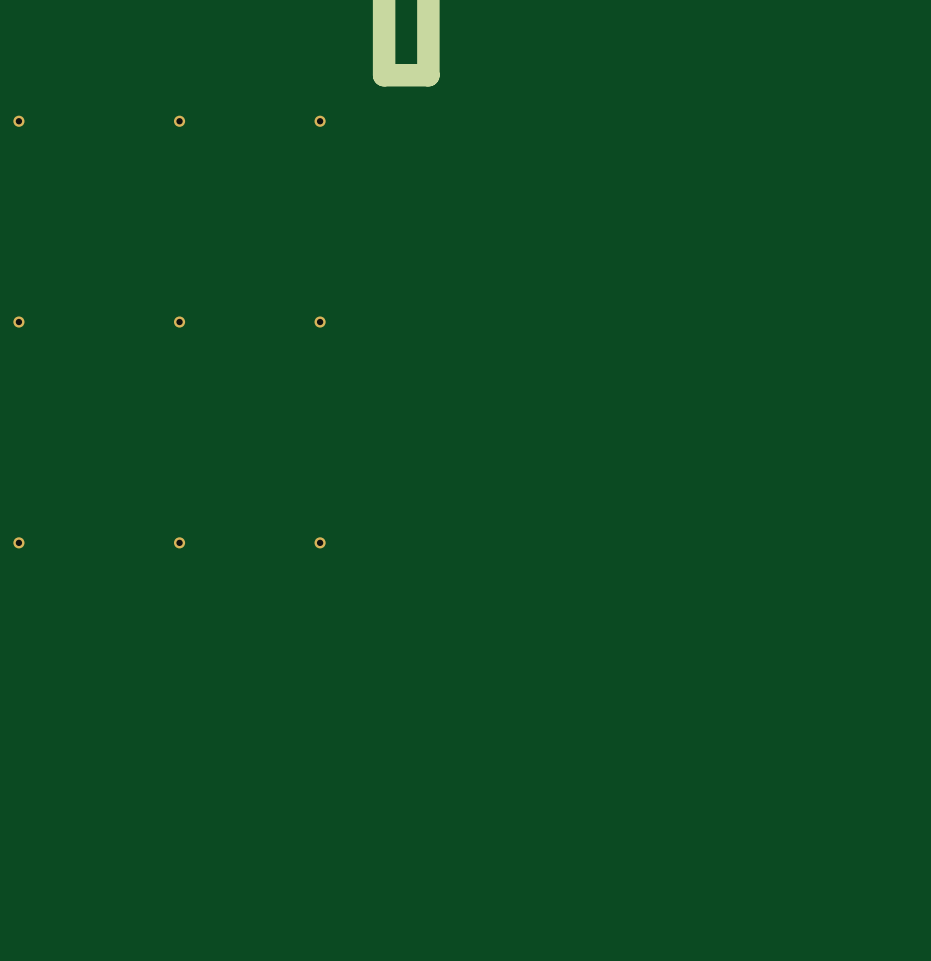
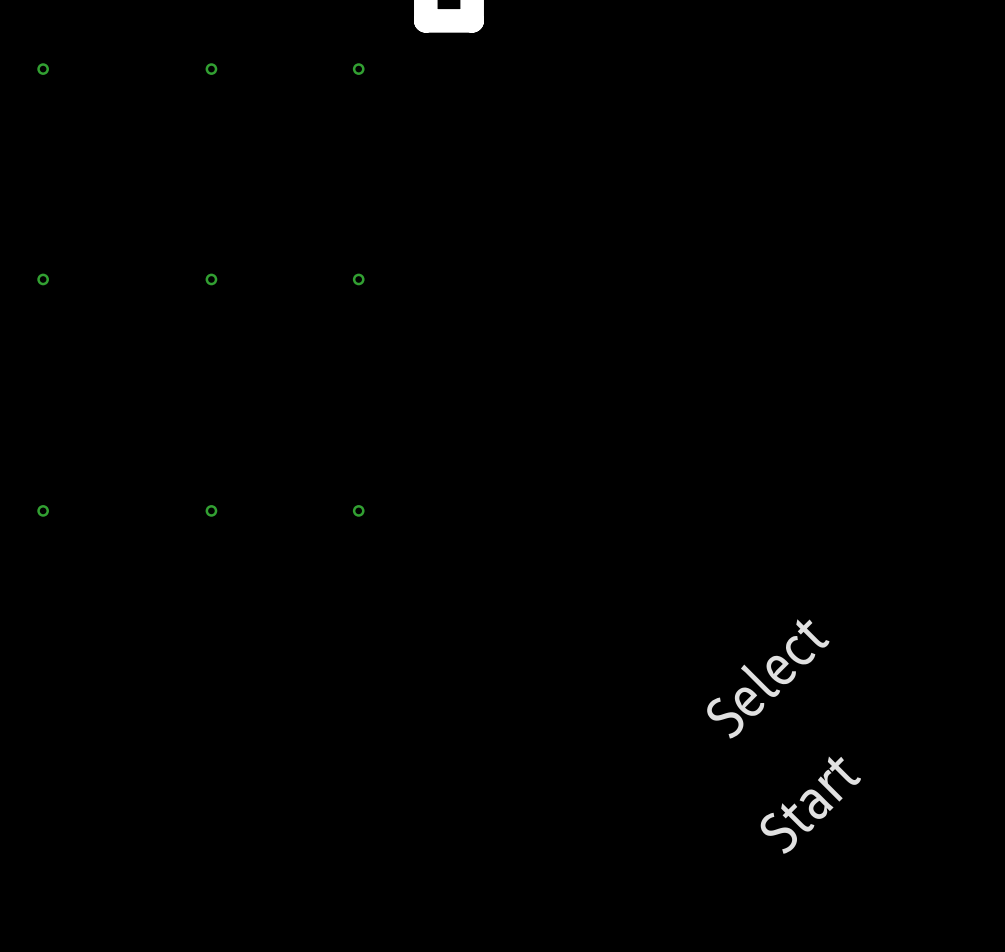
text: none -> Select (768, 678)
text: none -> Start (810, 805)

